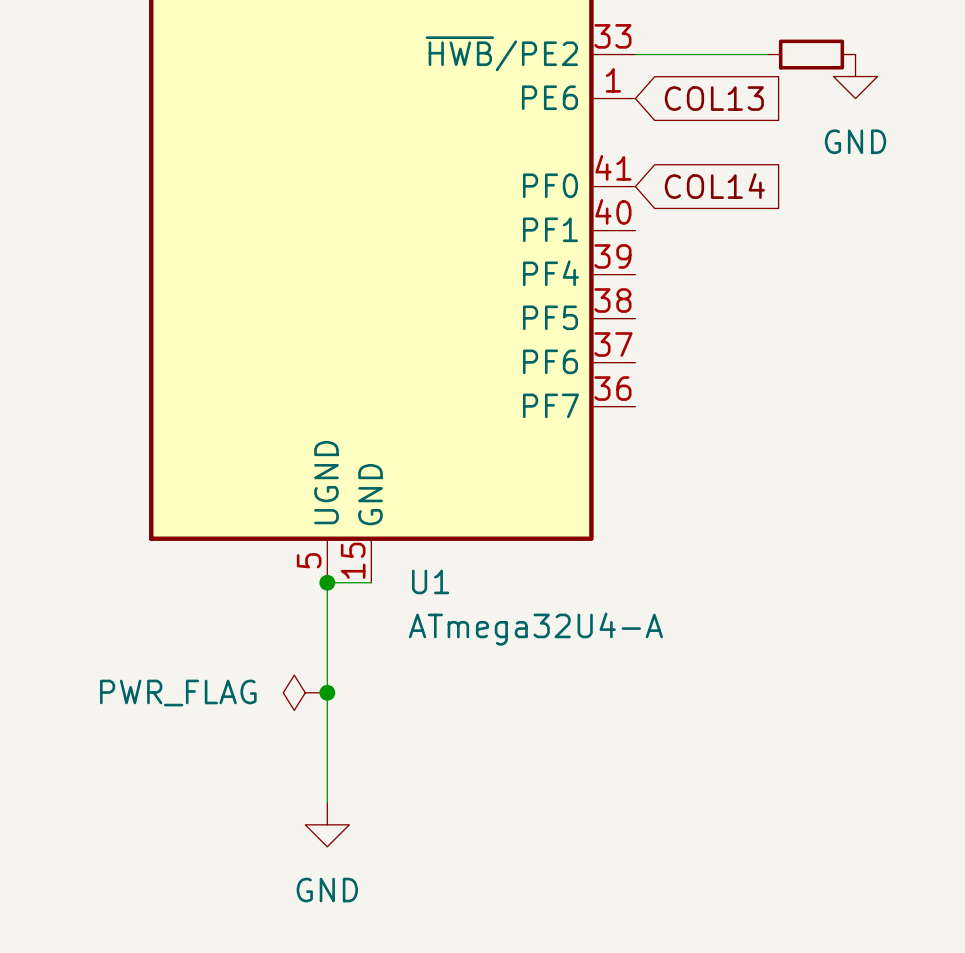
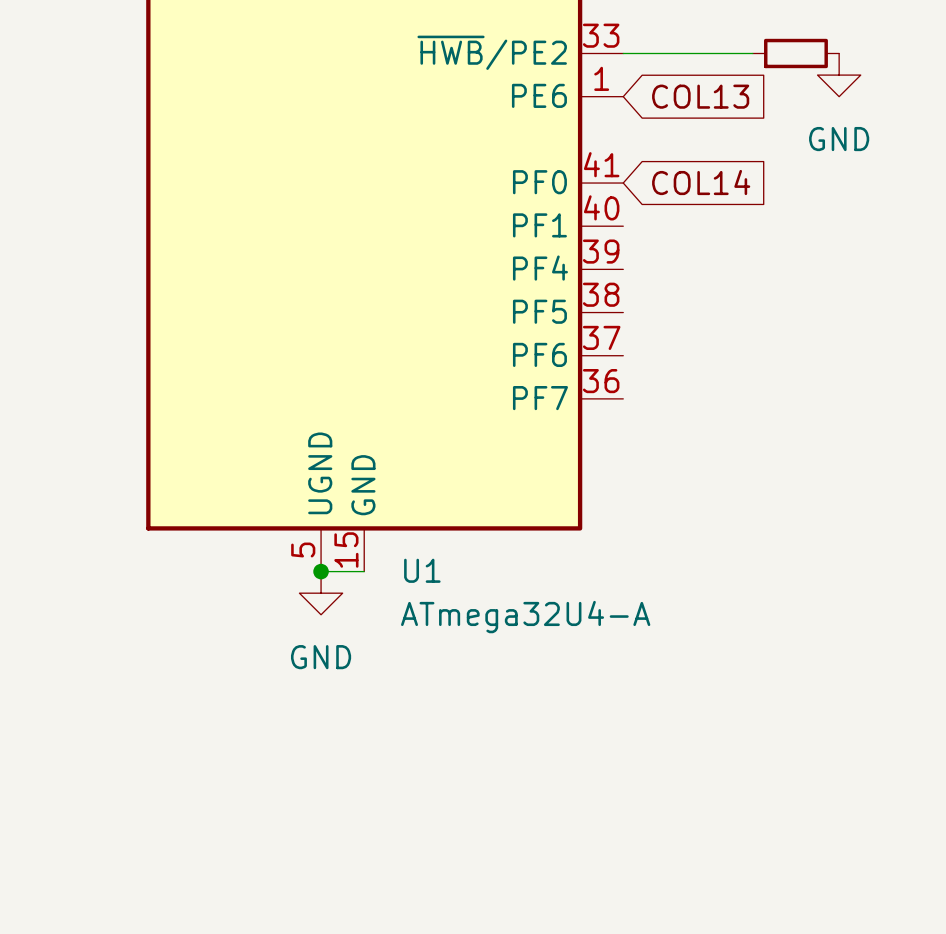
wire: (327, 582) (327, 802) -> none
power symbol: PWR_FLAG (305, 692) -> none
junction: (327, 692) -> none
power symbol position: GND (327, 824) -> GND (321, 593)

